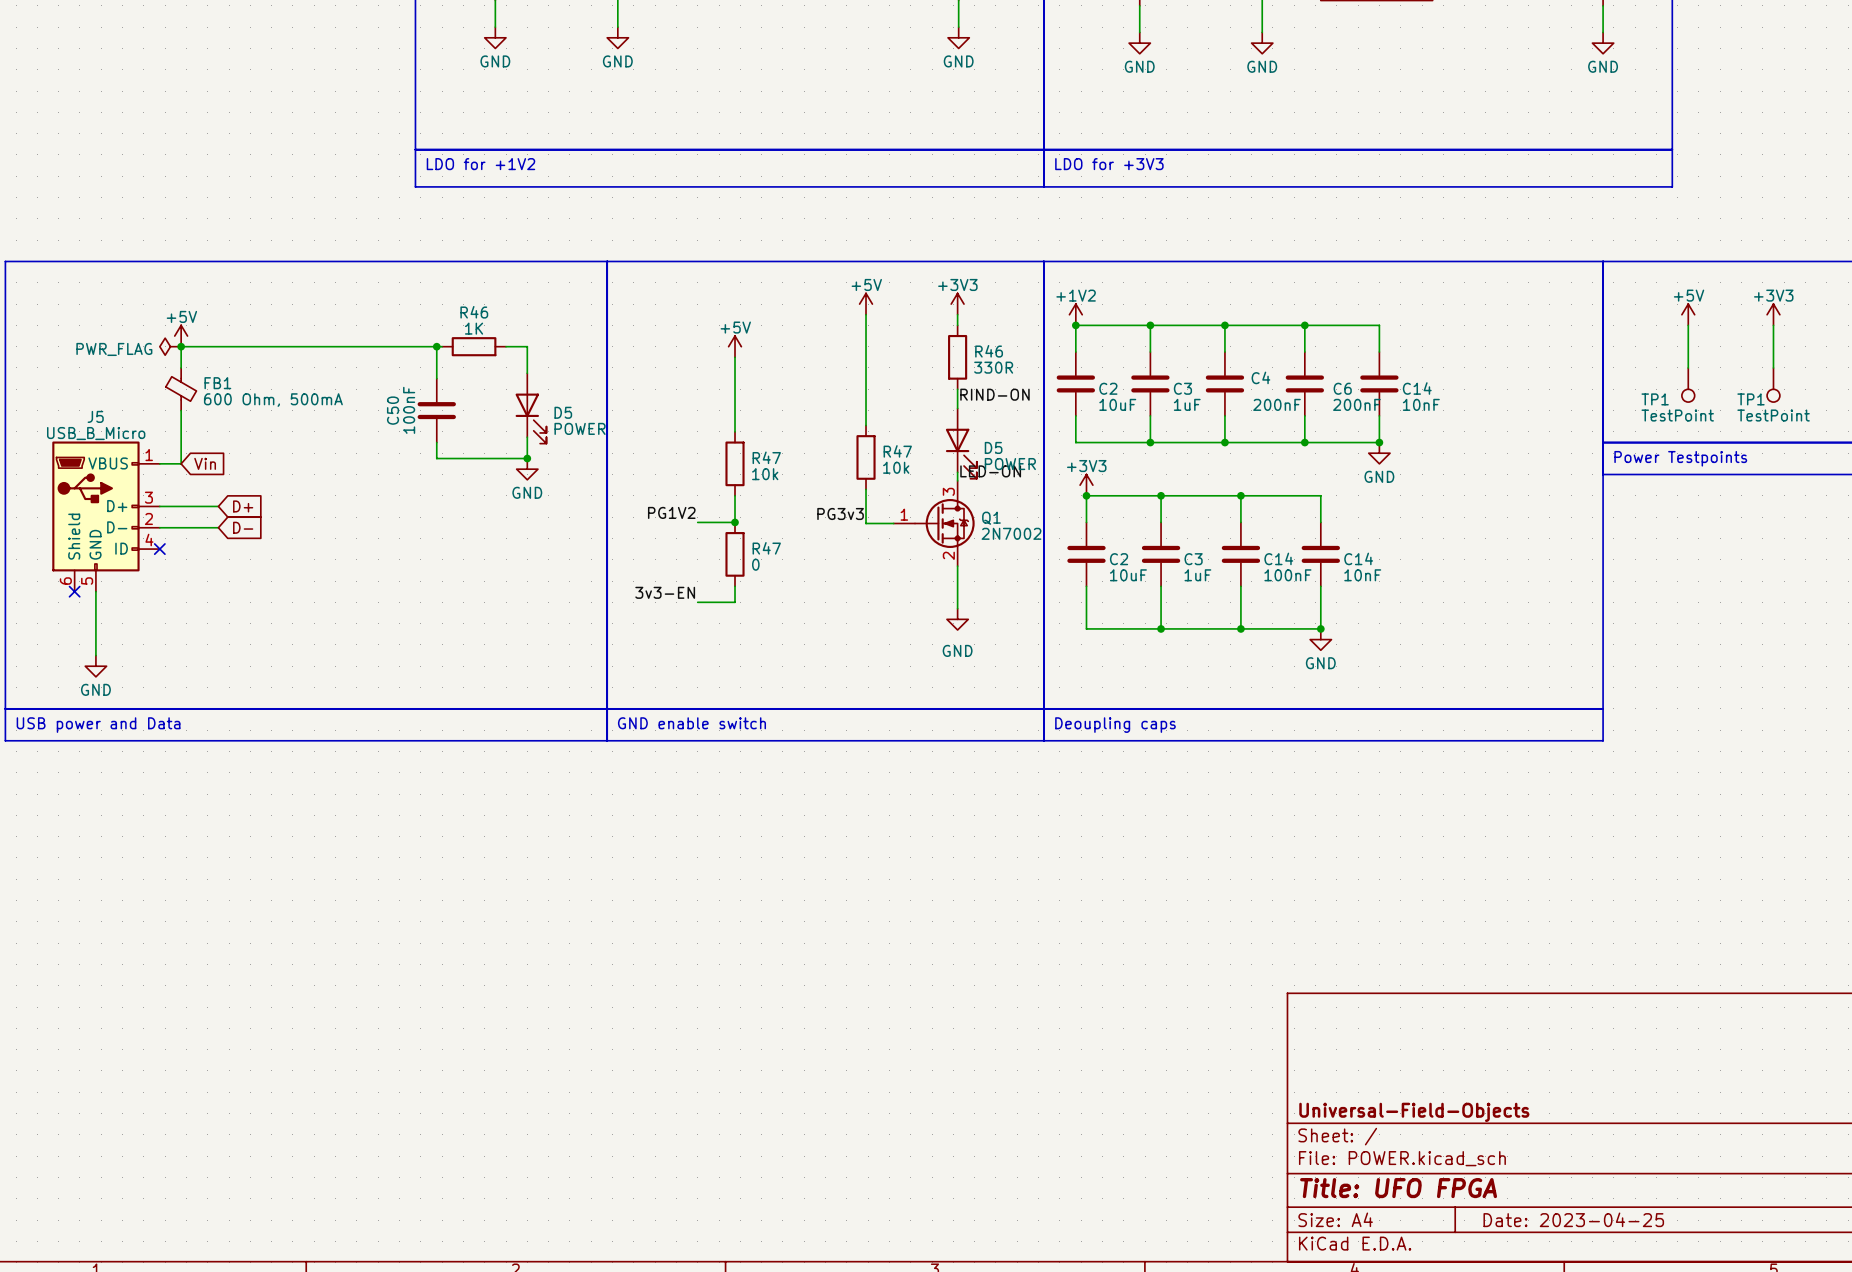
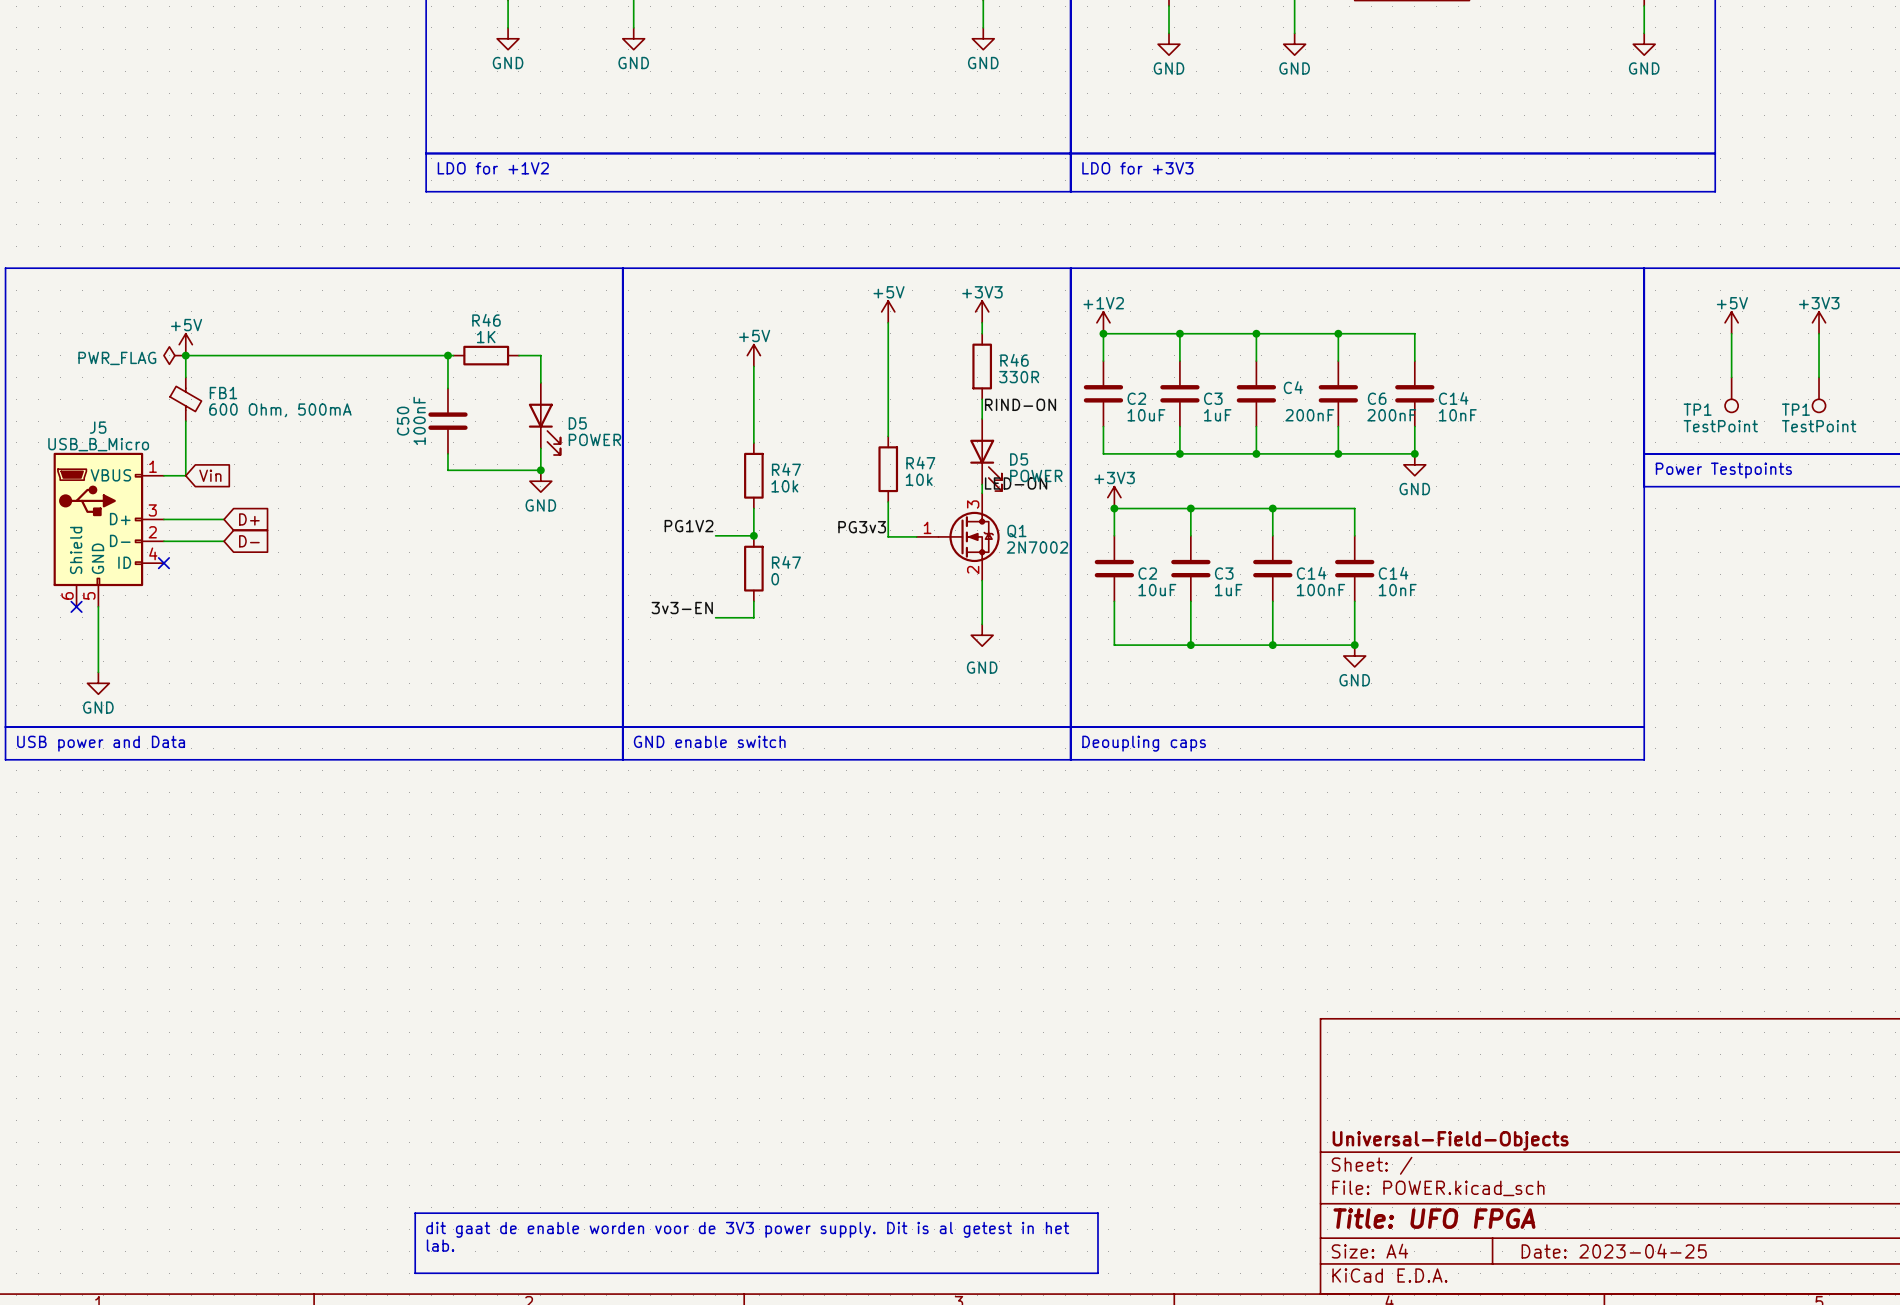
line: none -> (415, 1213) (1097, 1213) (1097, 1273) (415, 1273) (415, 1213)
text: none -> dit gaat de enable worden voor de 3V3 power supply. Dit is al getest in het (747, 1229)
text: none -> lab. (440, 1245)

